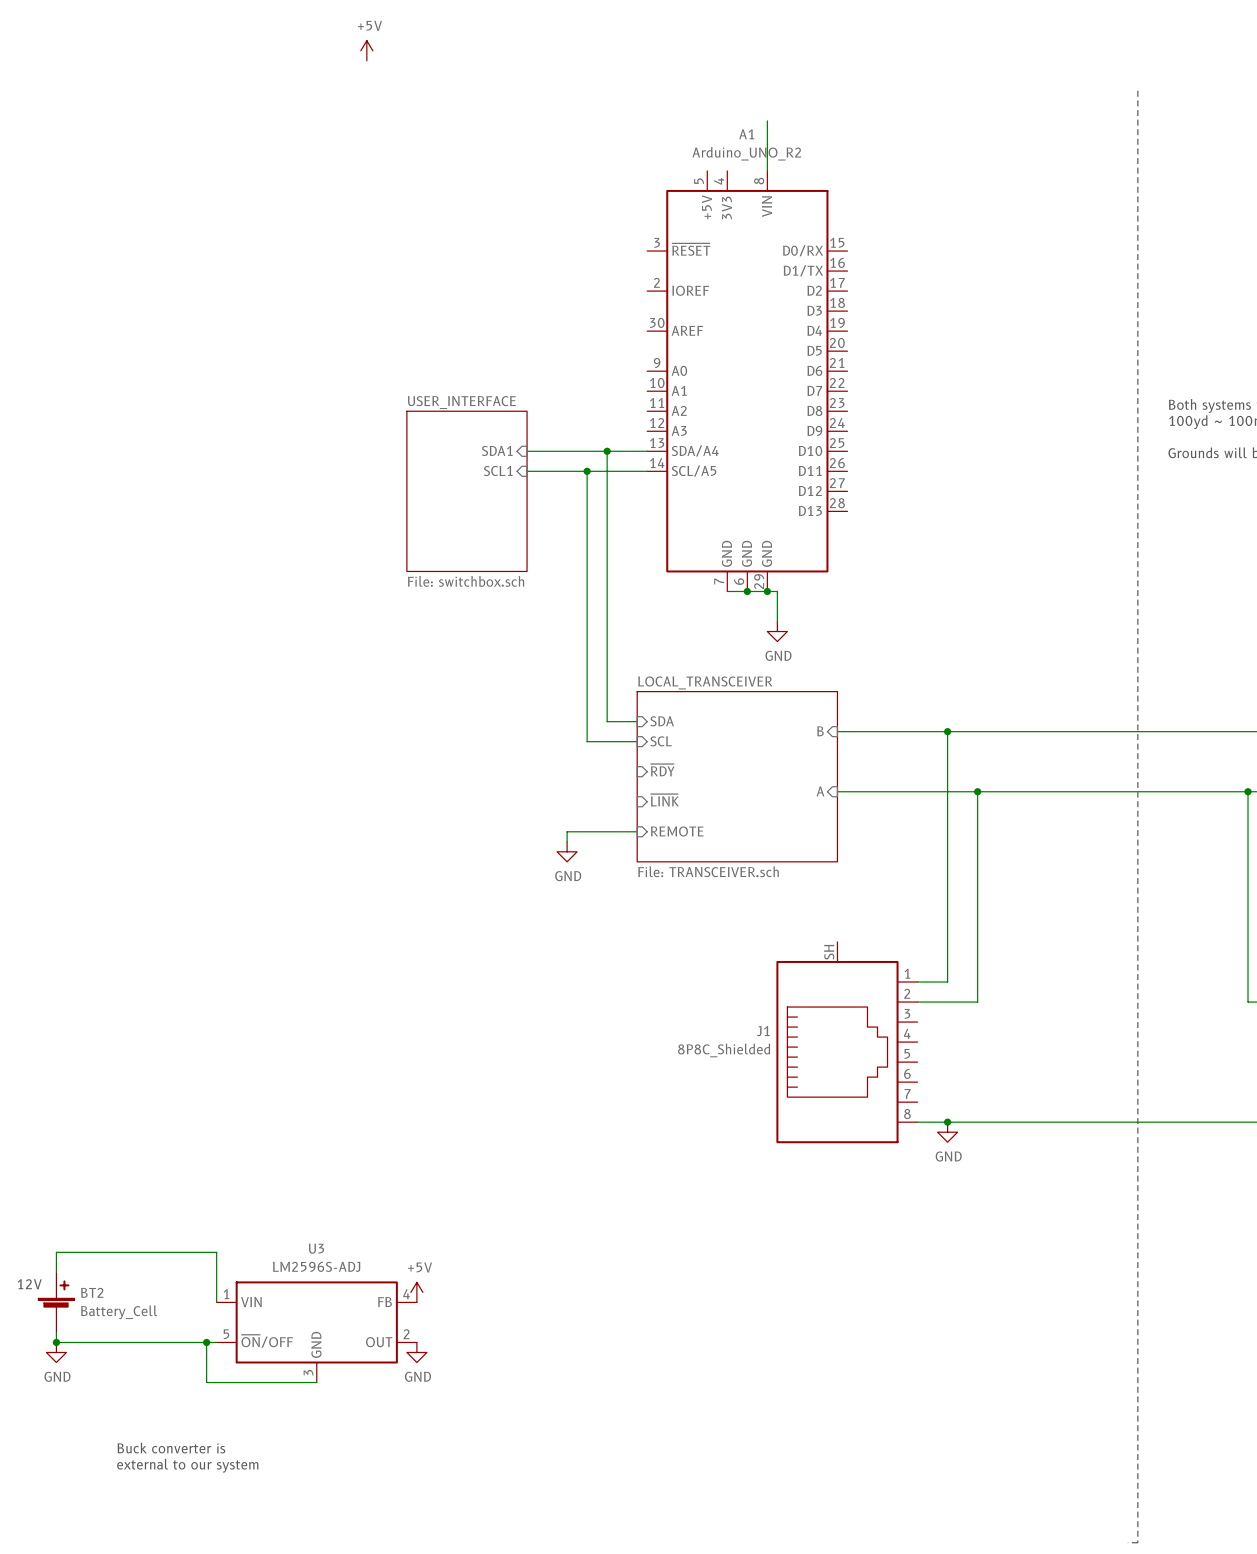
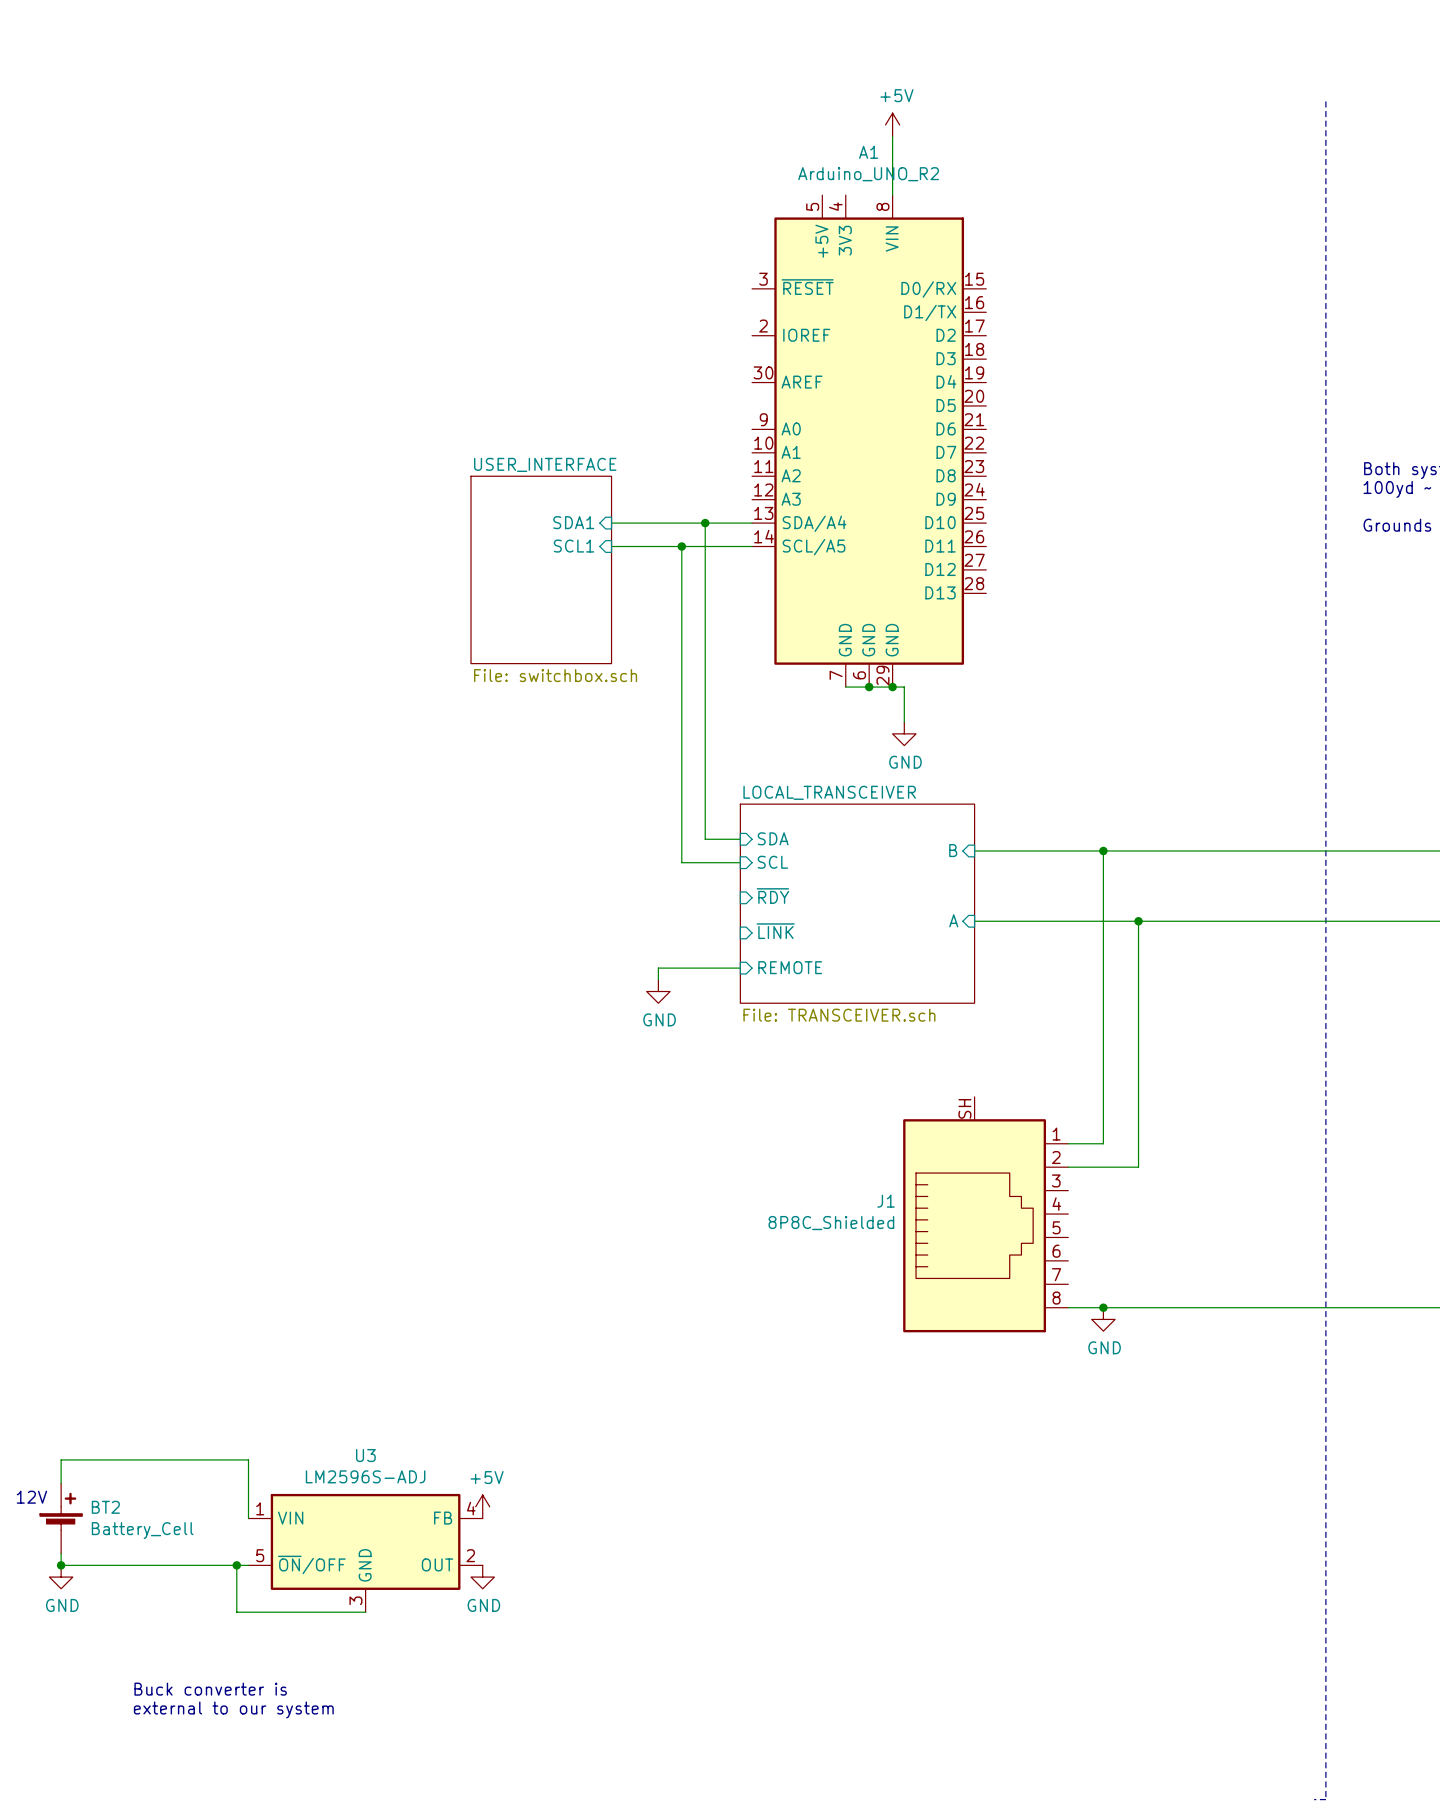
power symbol: +5V (366, 50) -> none
power symbol: none -> +5V (892, 124)

